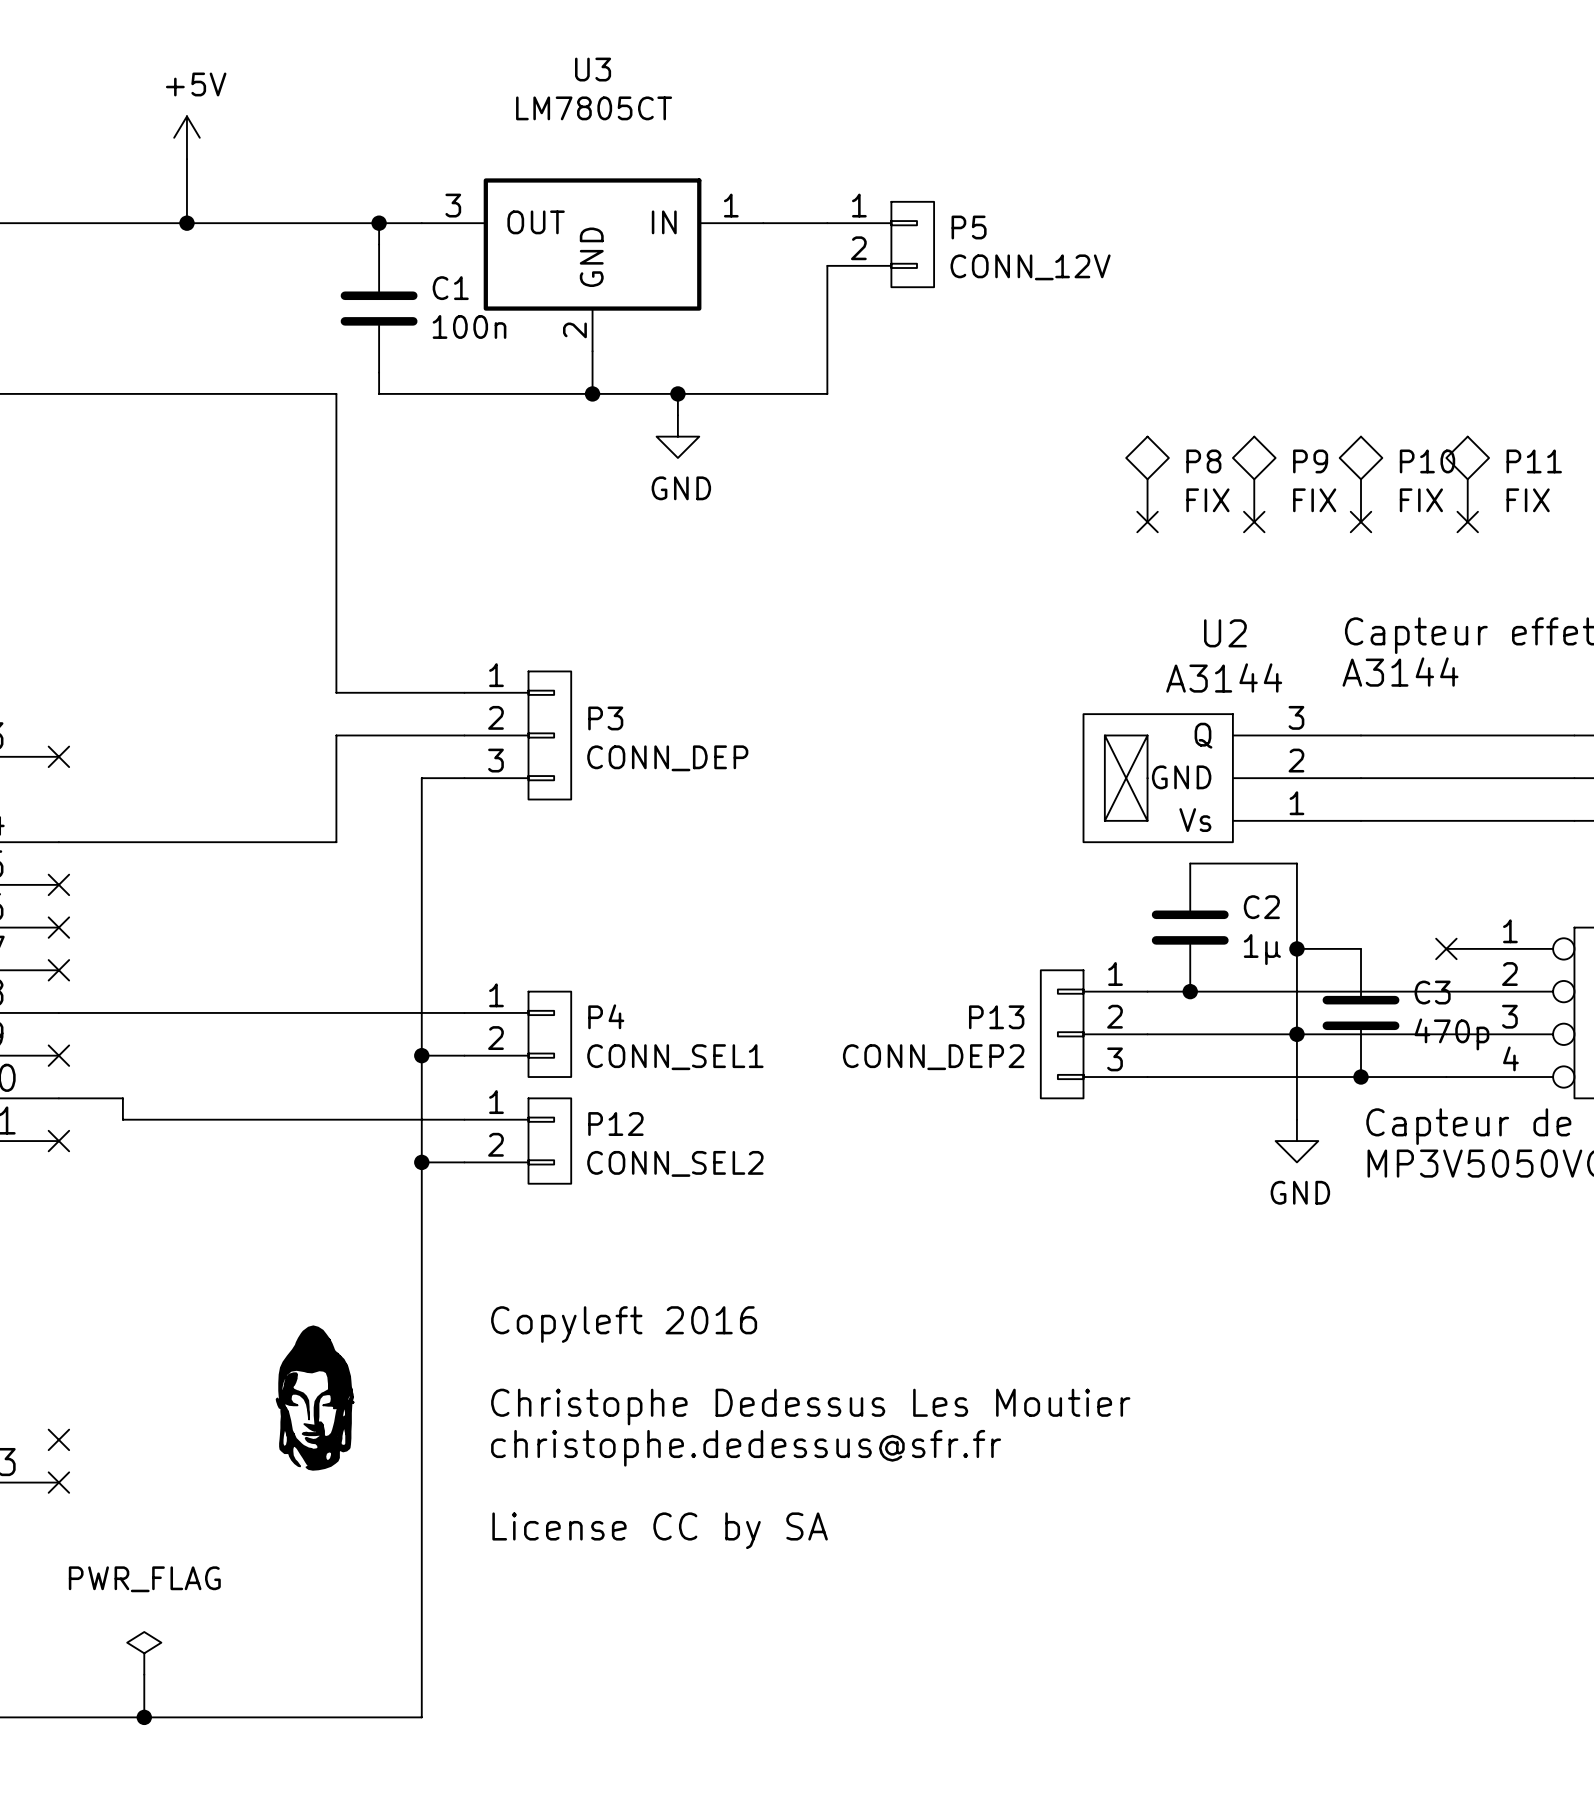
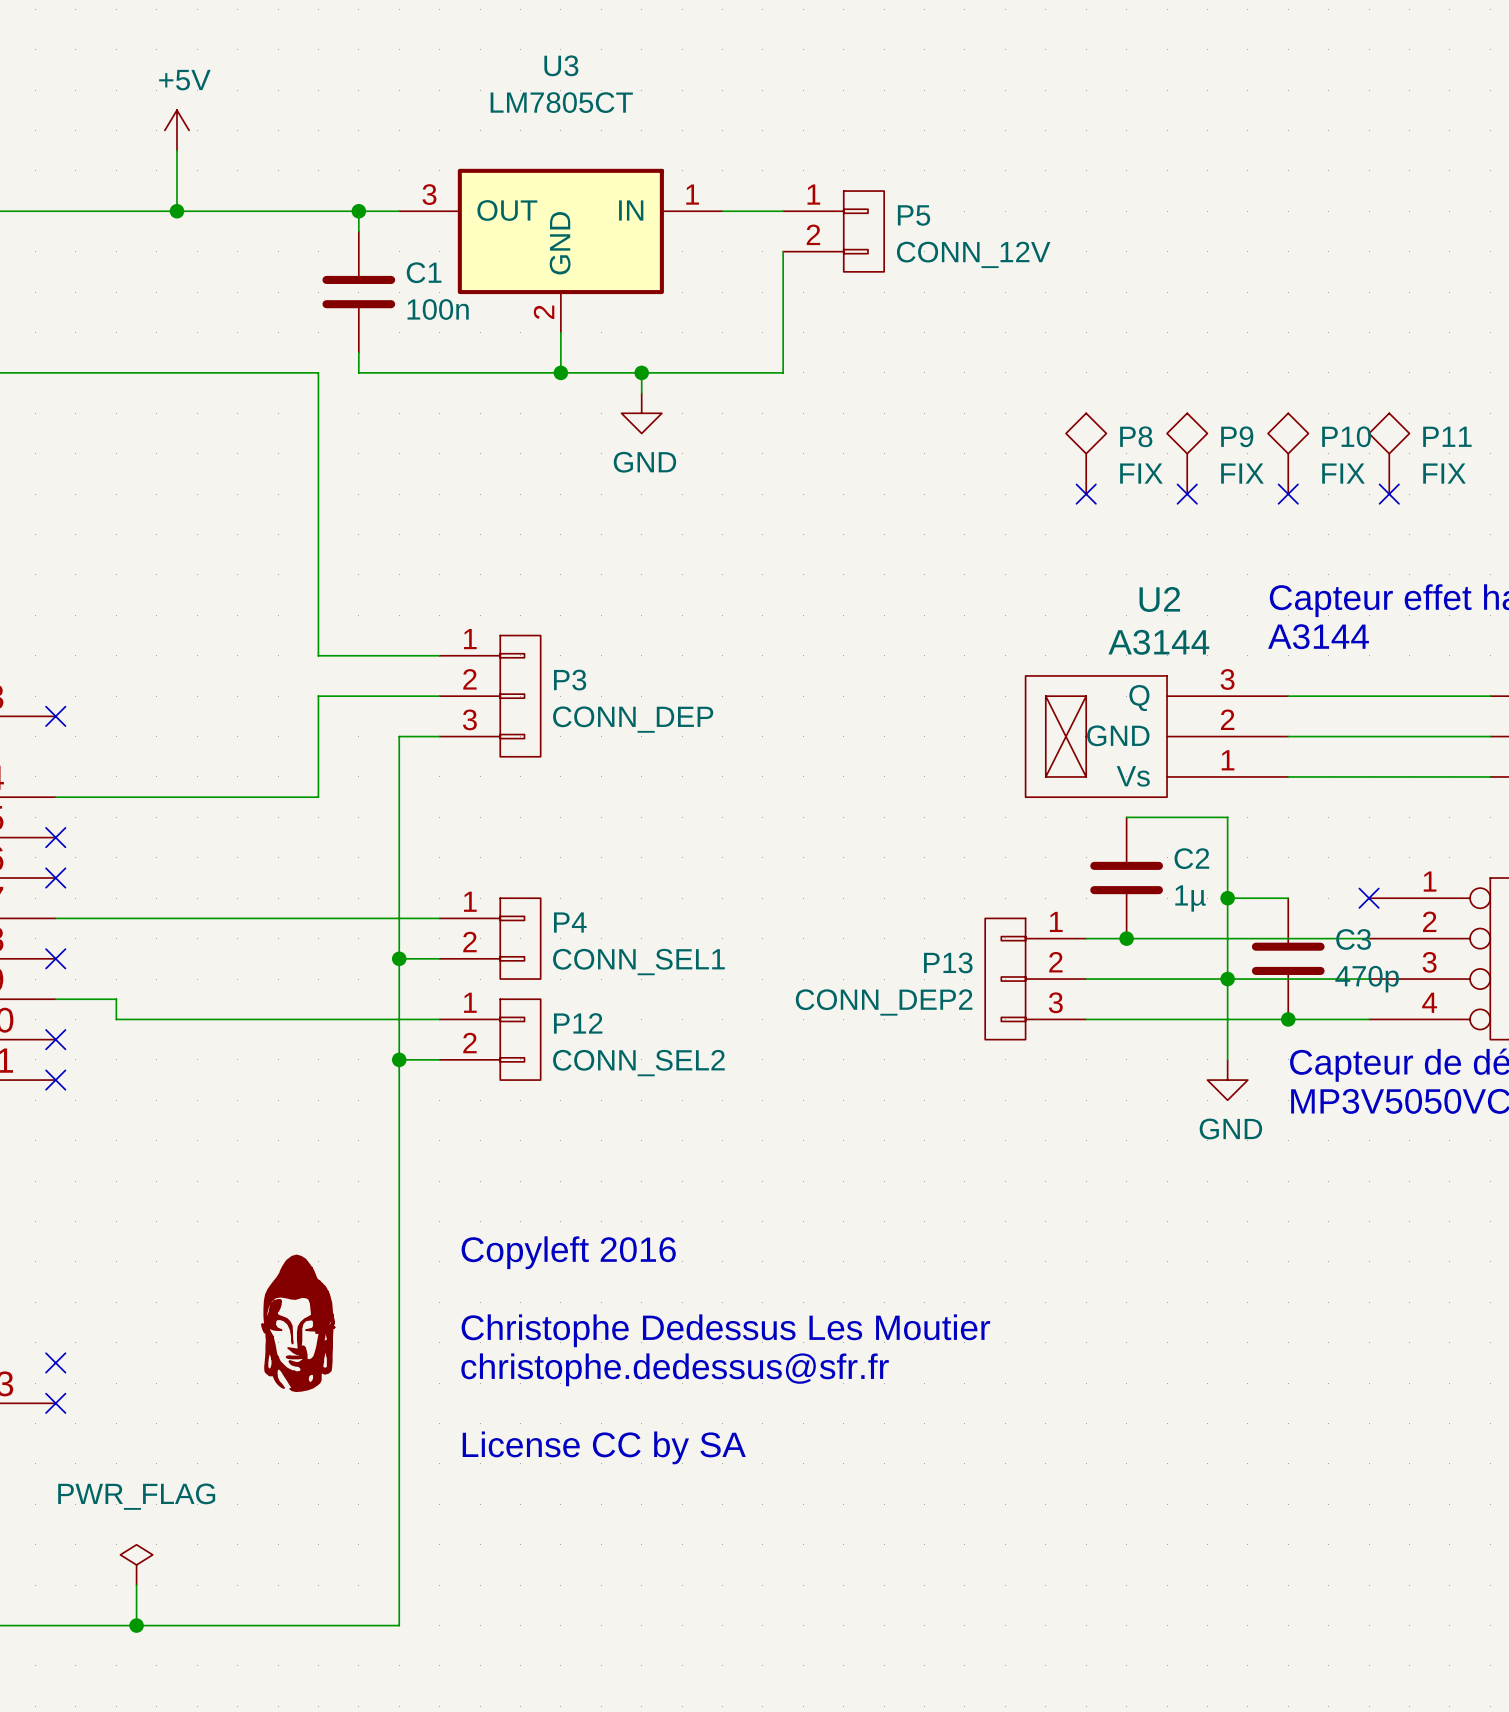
wire: none -> (55, 918) (439, 918)
no-connect mark: (58, 970) -> none
wire: (58, 1012) (421, 1012) -> none
no-connect mark: none -> (55, 958)
junction: none -> (399, 958)
P4 position: (517, 1034) -> (490, 938)
wire: none -> (55, 999) (116, 999) (116, 1019) (439, 1019)
no-connect mark: (58, 1055) -> none
wire: (421, 1055) (464, 1055) -> none
junction: (421, 1055) -> none
wire: (58, 1098) (122, 1098) (122, 1119) (421, 1119) -> none
no-connect mark: none -> (55, 1039)
junction: none -> (399, 1059)
P12 position: (517, 1141) -> (490, 1039)
wire: (421, 1162) (464, 1162) -> none
junction: (421, 1162) -> none

